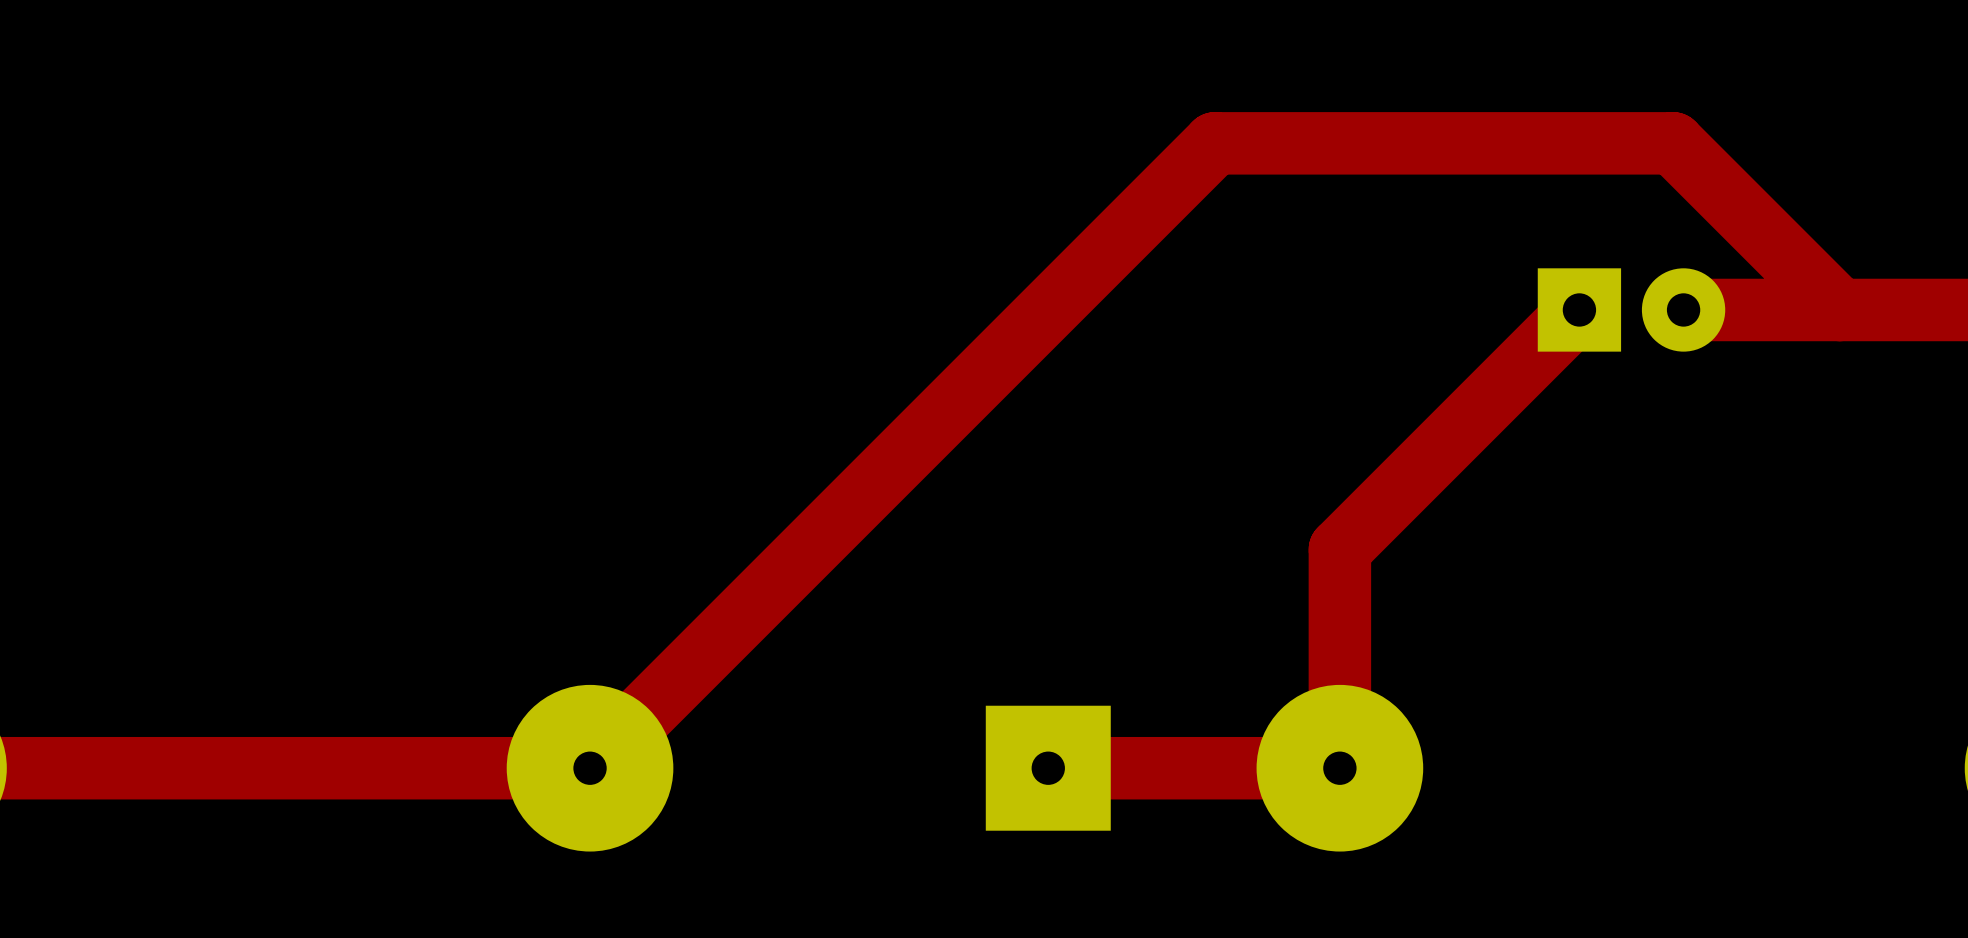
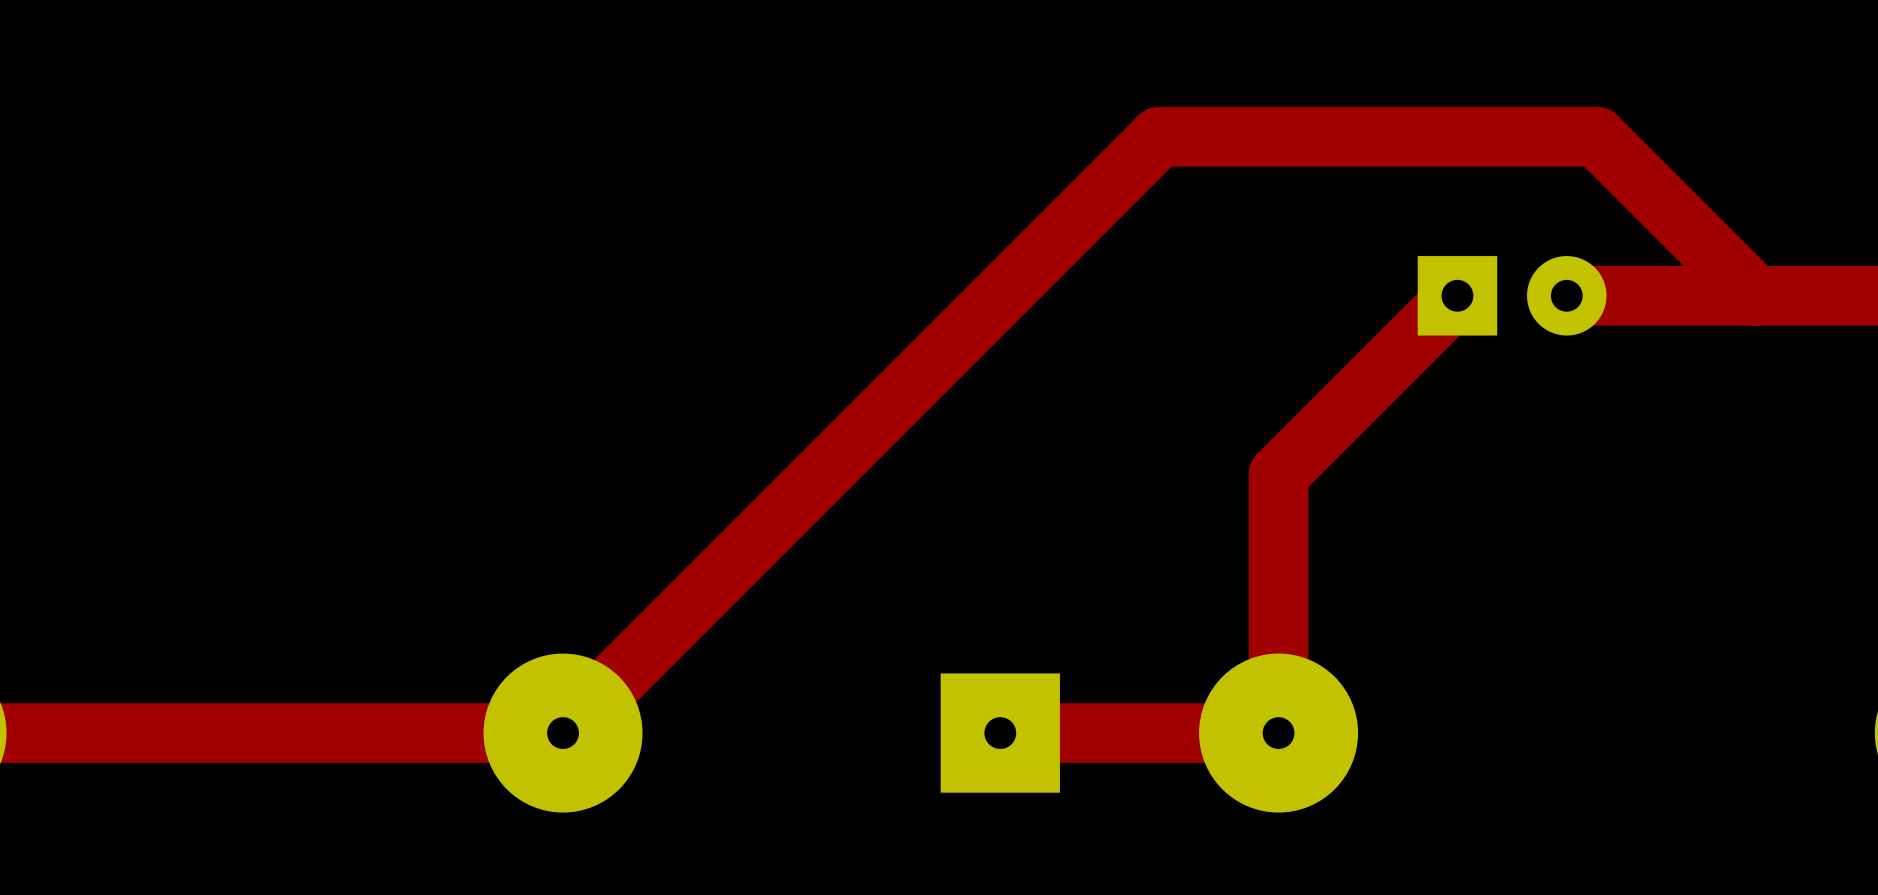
top track: (1579, 309) (1339, 549) -> (1457, 295) (1278, 474) (1278, 524)
part: none -> (1512, 295)
part: (1631, 309) -> none

